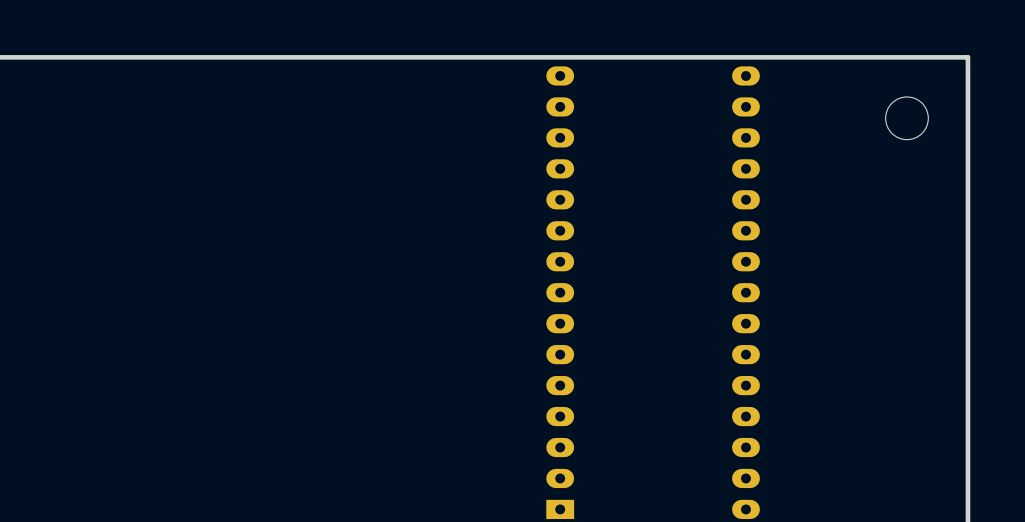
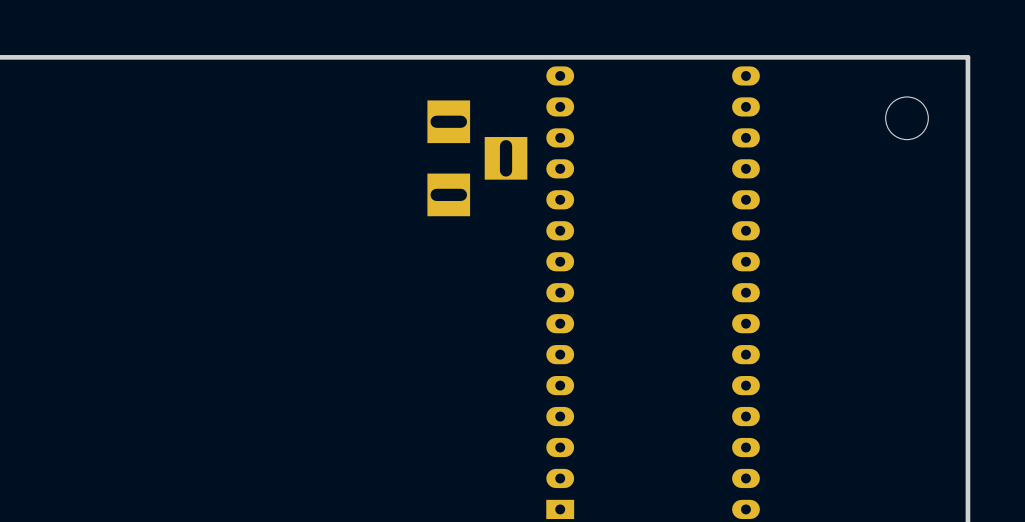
part: none -> (477, 158)

